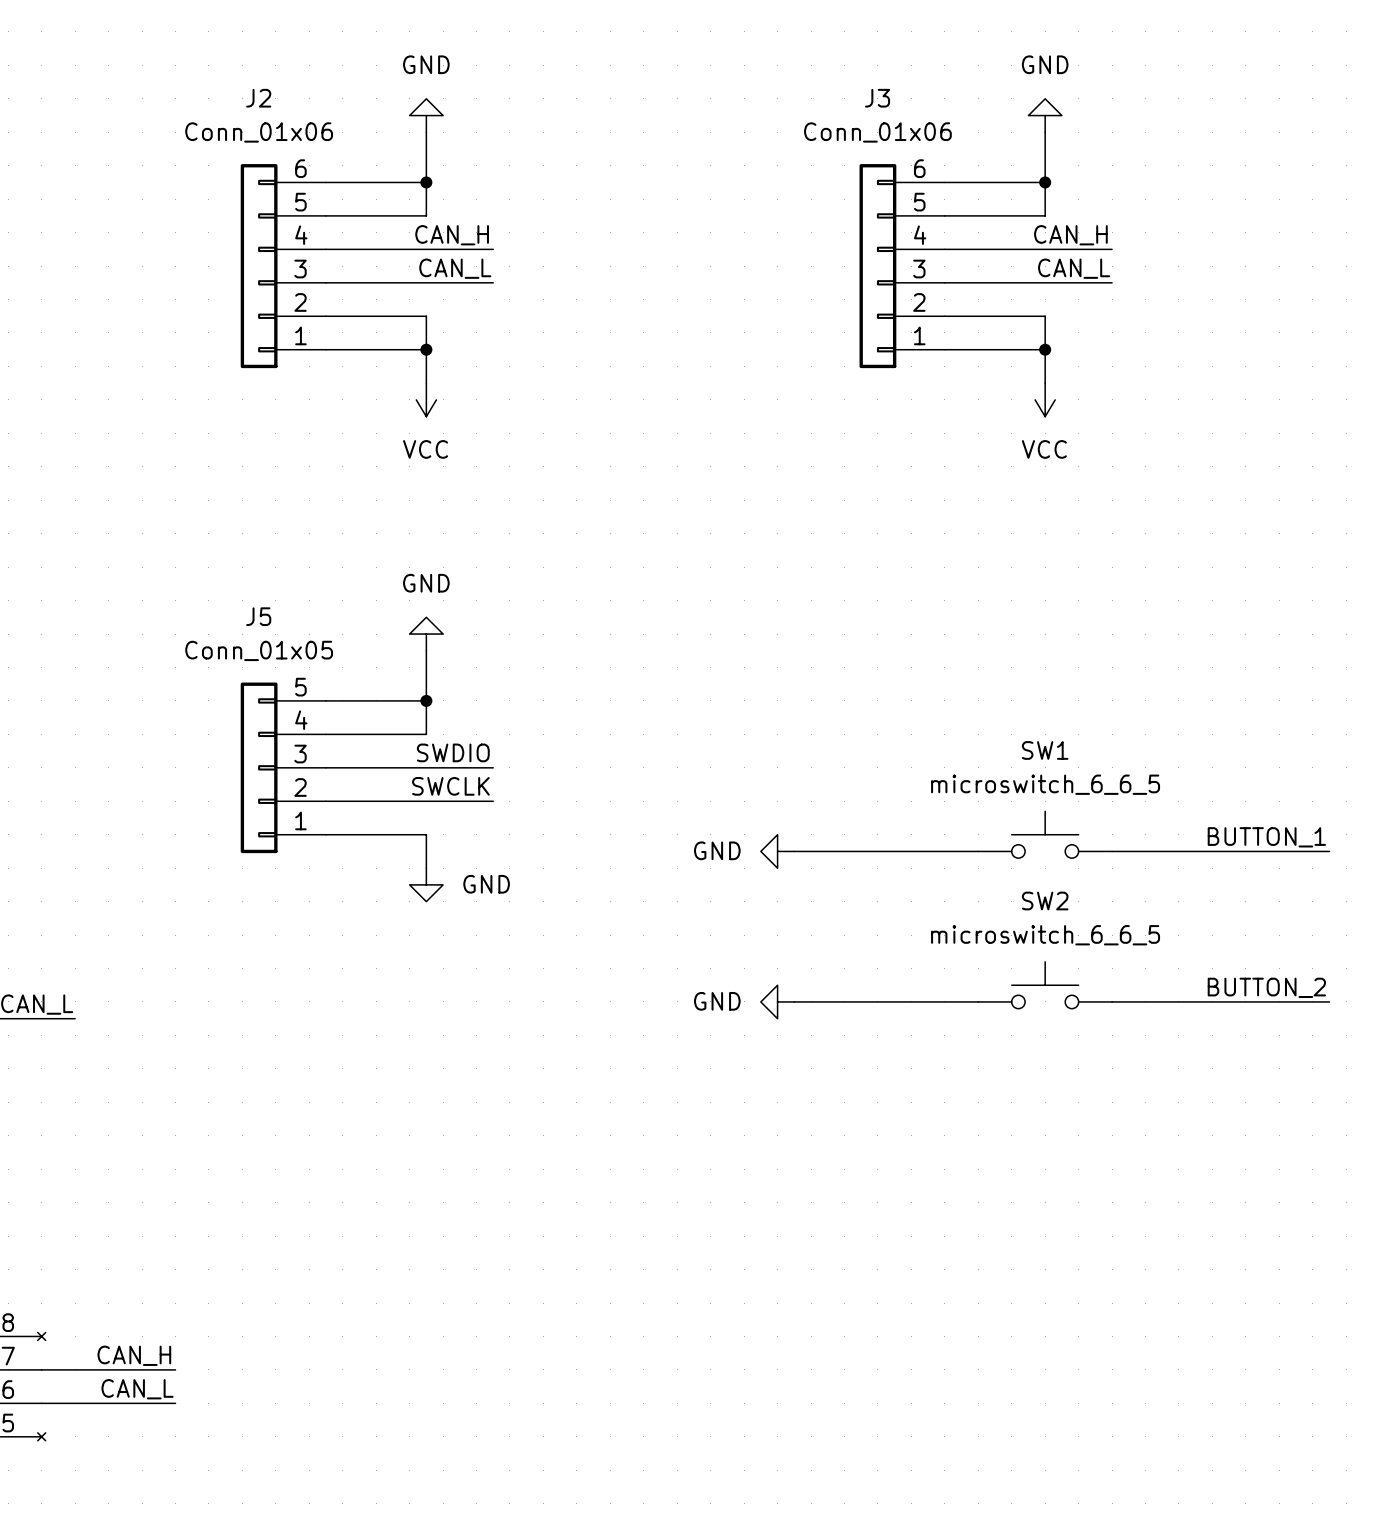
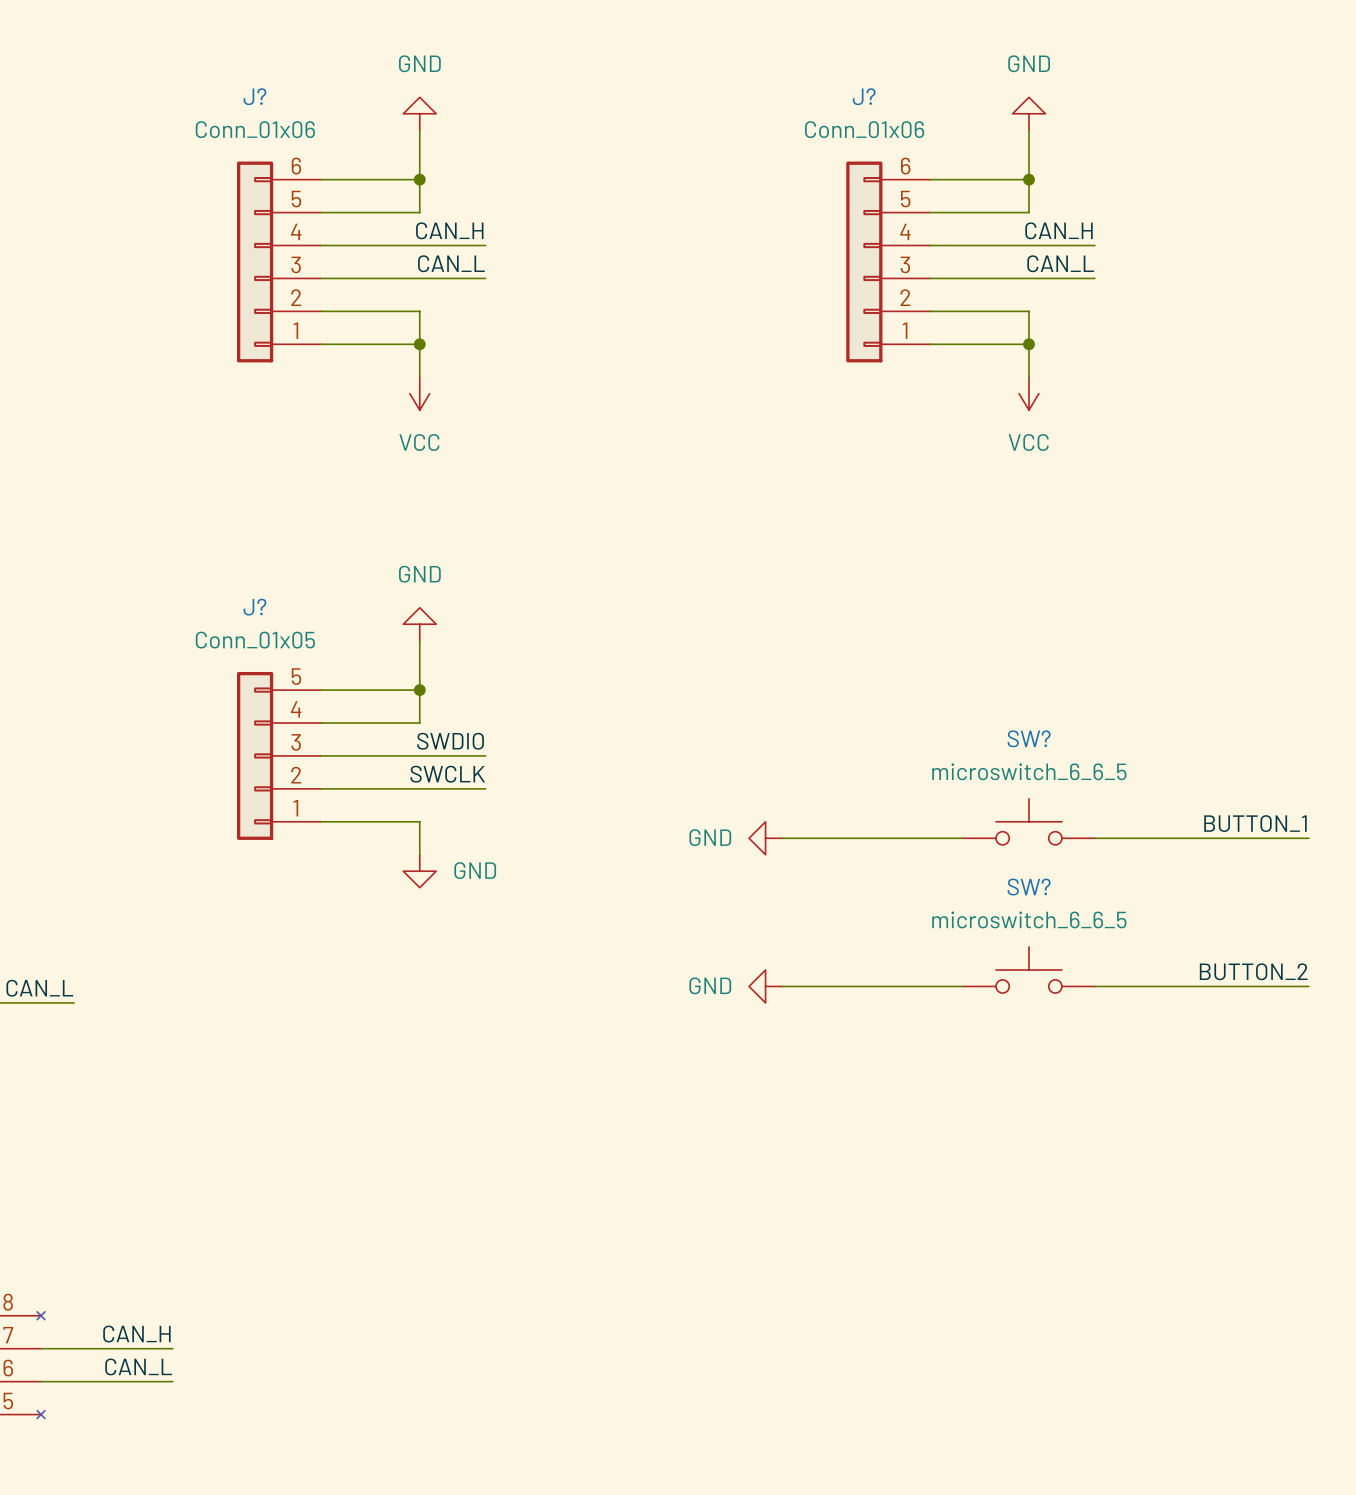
J2 name: J2 (258, 98) -> J? (254, 96)
J3 name: J3 (877, 98) -> J? (864, 96)
J5 name: J5 (258, 616) -> J? (254, 607)
SW1 name: SW1 (1045, 750) -> SW? (1029, 738)
SW2 name: SW2 (1045, 901) -> SW? (1029, 887)

